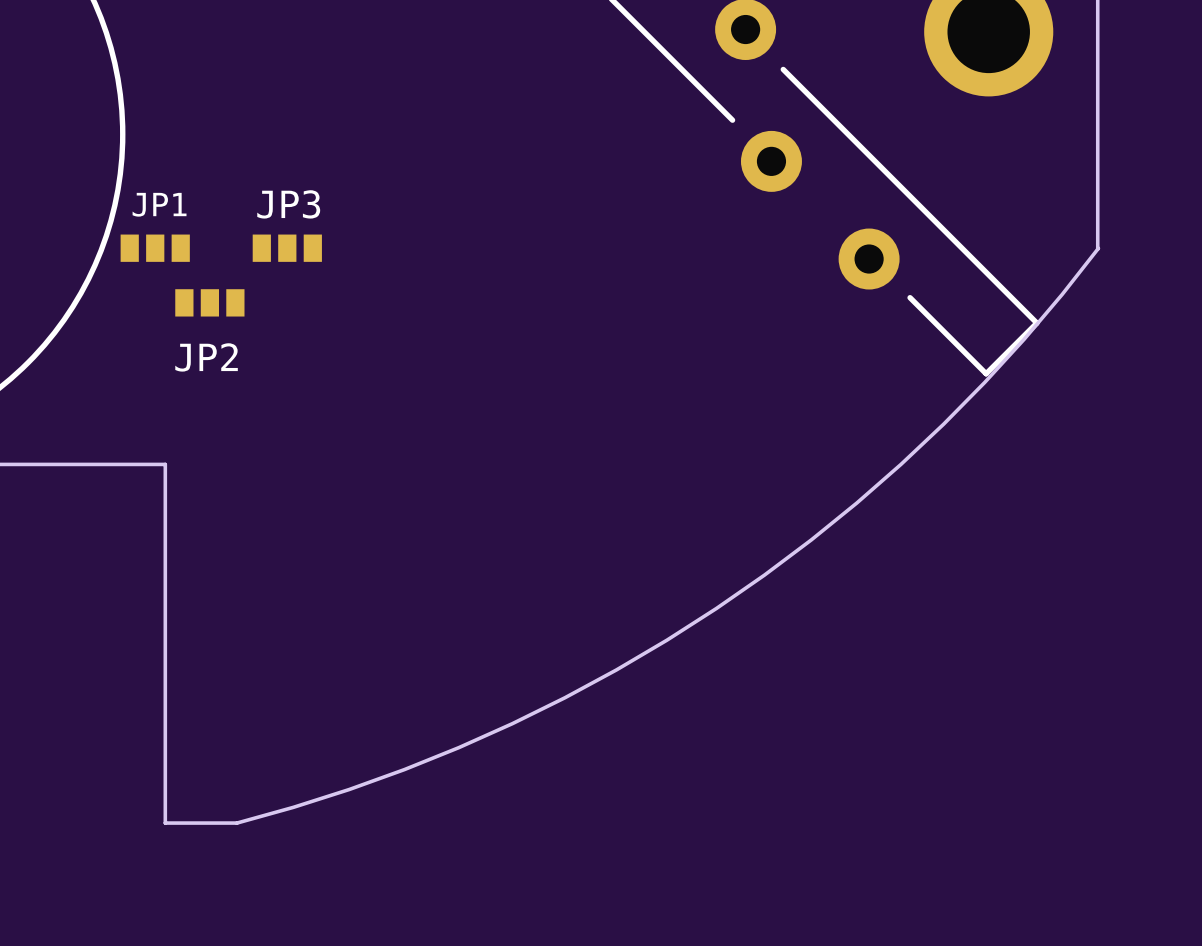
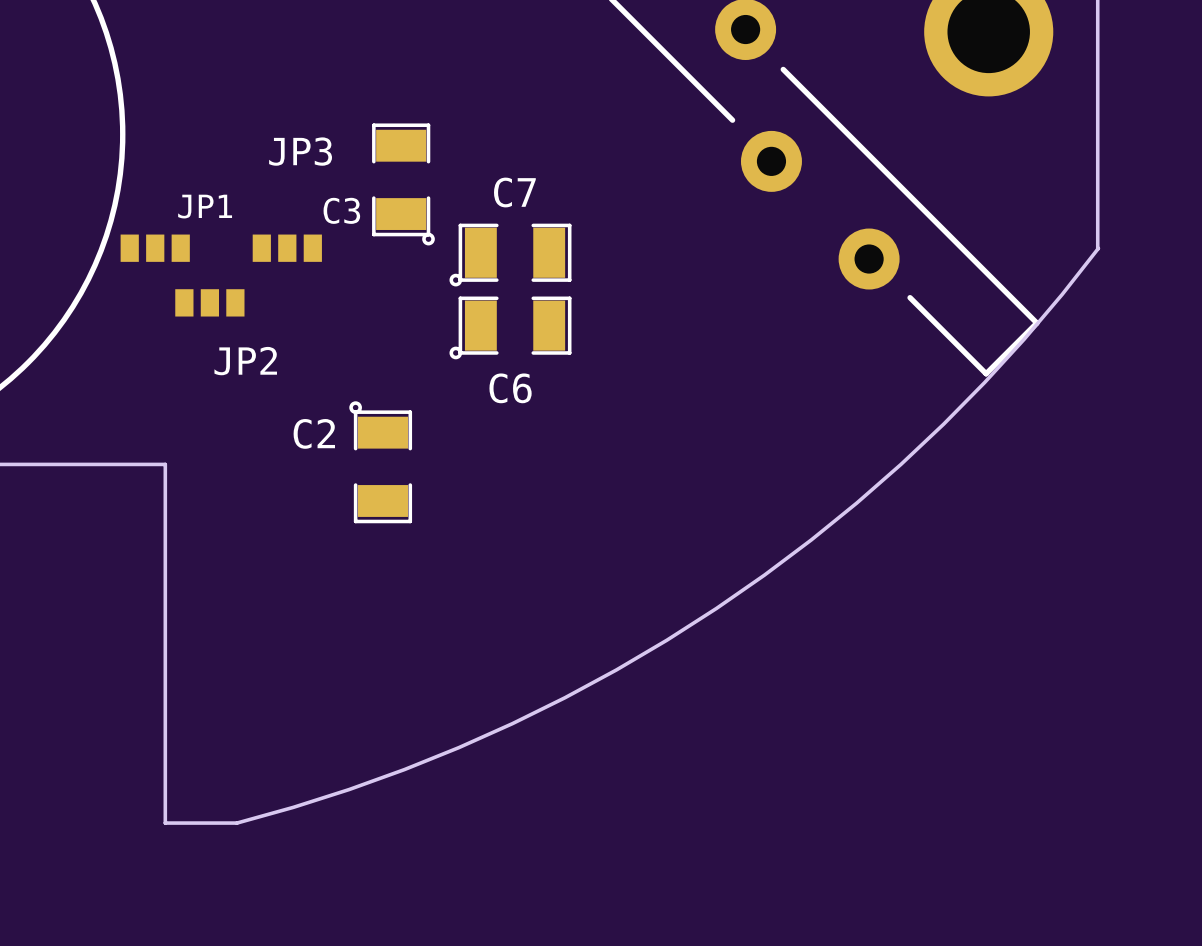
C3: none -> (403, 184)
JP1 name position: JP1 (159, 204) -> JP1 (205, 206)
JP3 name position: JP3 (288, 204) -> JP3 (300, 151)
C7: none -> (510, 255)
C6: none -> (510, 327)
JP2 name position: JP2 (206, 357) -> JP2 (245, 361)
C2: none -> (380, 462)

